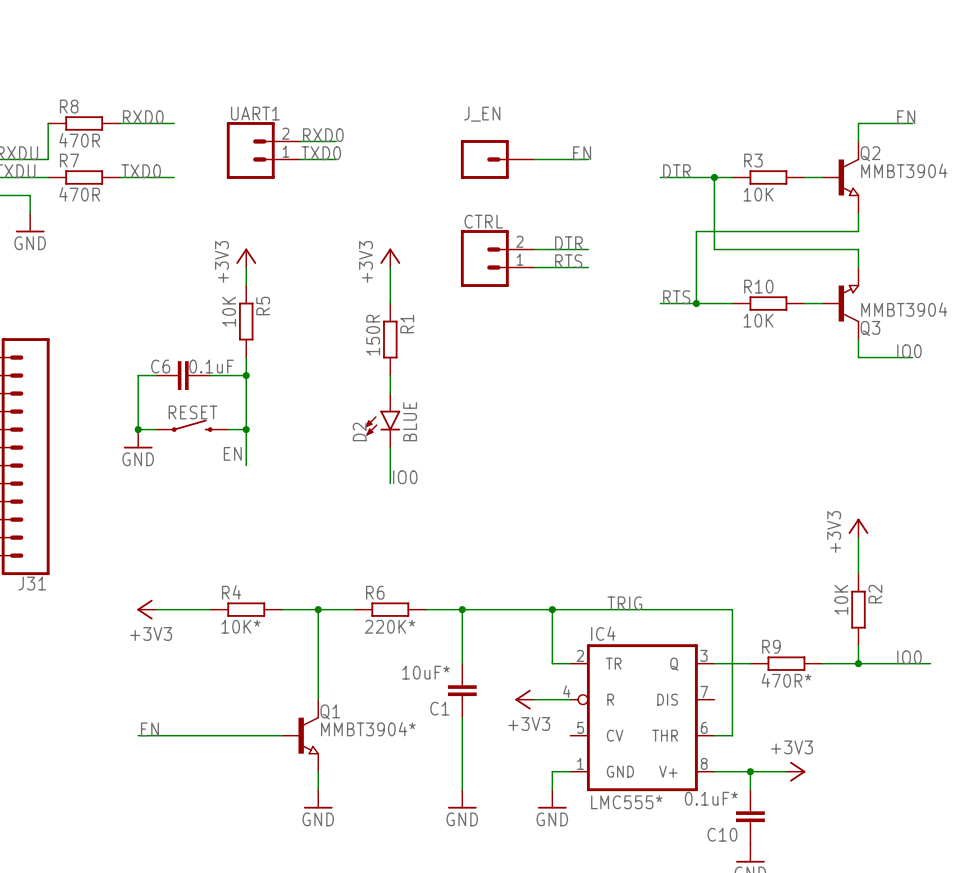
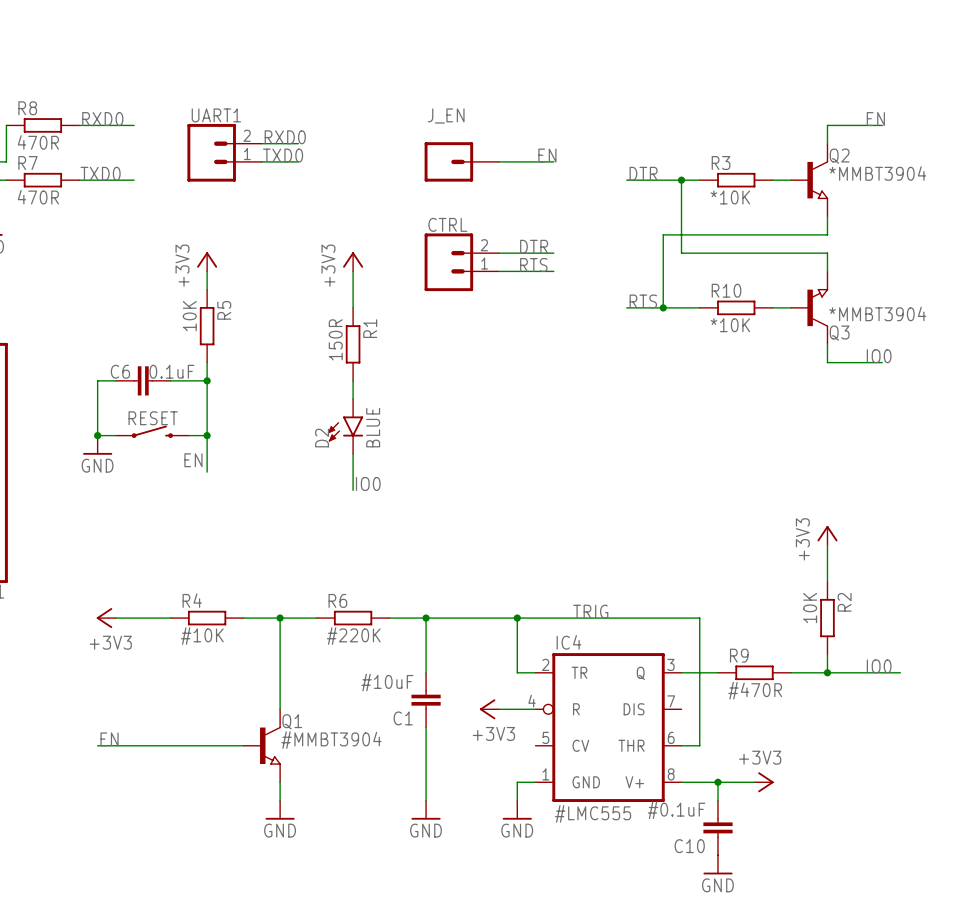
Q2 value: MMBT3904 (904, 170) -> *MMBT3904 (877, 173)
R3 value: 10K (758, 194) -> *10K (730, 197)
Q3 value: MMBT3904 (904, 309) -> *MMBT3904 (877, 313)
R10 value: 10K (758, 320) -> *10K (730, 325)
R4 value: 10K* (240, 626) -> #10K (202, 636)
R6 value: 220K* (390, 626) -> #220K (353, 636)
C1 value: 10uF* (426, 672) -> #10uF (387, 682)
R9 value: 470R* (786, 680) -> #470R (755, 690)
Q1 value: MMBT3904* (368, 729) -> #MMBT3904 (331, 740)
C10 value: 0.1uF* (711, 798) -> #0.1uF (676, 810)
IC4 value: LMC555* (626, 802) -> #LMC555 (593, 813)

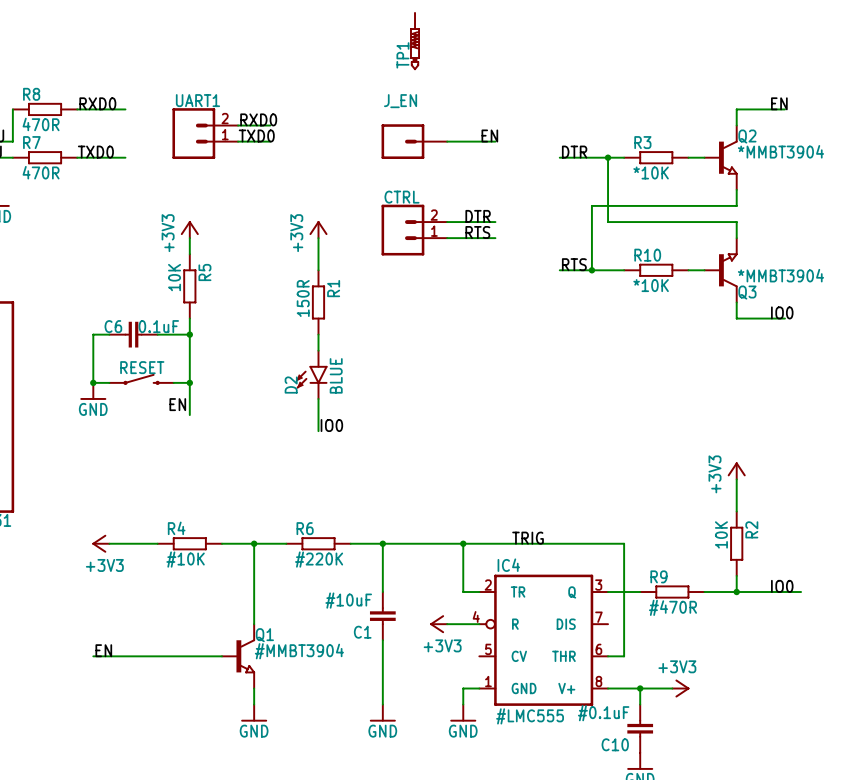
TP1: none -> (415, 41)

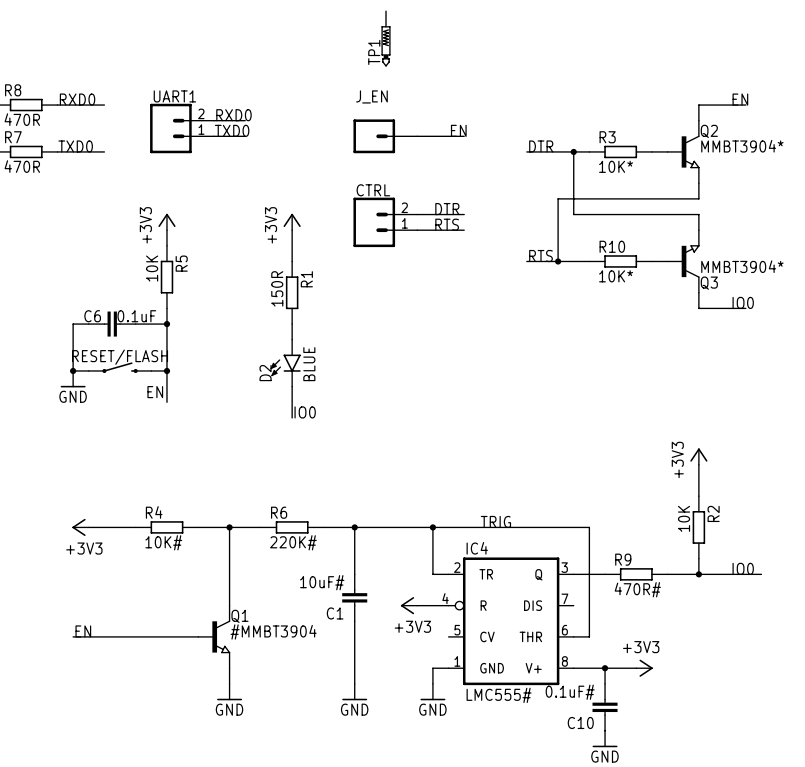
Q2 value: *MMBT3904 (780, 151) -> MMBT3904* (742, 146)
R3 value: *10K (651, 172) -> 10K* (616, 166)
Q3 value: *MMBT3904 (780, 275) -> MMBT3904* (742, 266)
R10 value: *10K (651, 285) -> 10K* (616, 276)
RESET name: RESET (142, 367) -> RESET/FLASH (120, 357)
R4 value: #10K (185, 559) -> 10K# (163, 542)
R6 value: #220K (319, 559) -> 220K# (293, 542)
C1 value: #10uF (348, 600) -> 10uF# (322, 582)
R9 value: #470R (672, 607) -> 470R# (637, 589)
C10 value: #0.1uF (603, 713) -> 0.1uF# (570, 692)
IC4 value: #LMC555 (530, 716) -> LMC555# (499, 695)

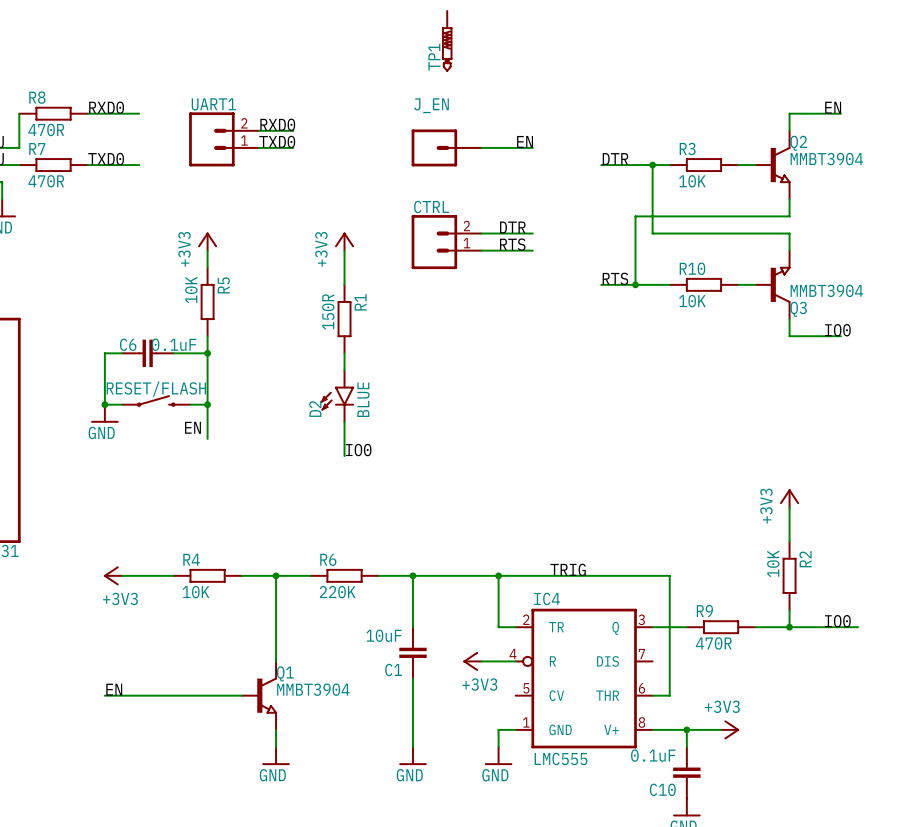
Q2 value: MMBT3904* (742, 146) -> MMBT3904 (826, 159)
R3 value: 10K* (616, 166) -> 10K (692, 181)
Q3 value: MMBT3904* (742, 266) -> MMBT3904 (826, 290)
R10 value: 10K* (616, 276) -> 10K (692, 301)
R4 value: 10K# (163, 542) -> 10K (196, 592)
R6 value: 220K# (293, 542) -> 220K (337, 592)
C1 value: 10uF# (322, 582) -> 10uF (384, 635)
R9 value: 470R# (637, 589) -> 470R (713, 643)
Q1 value: #MMBT3904 (273, 631) -> MMBT3904 (313, 689)
C10 value: 0.1uF# (570, 692) -> 0.1uF (653, 755)
IC4 value: LMC555# (499, 695) -> LMC555 (561, 759)

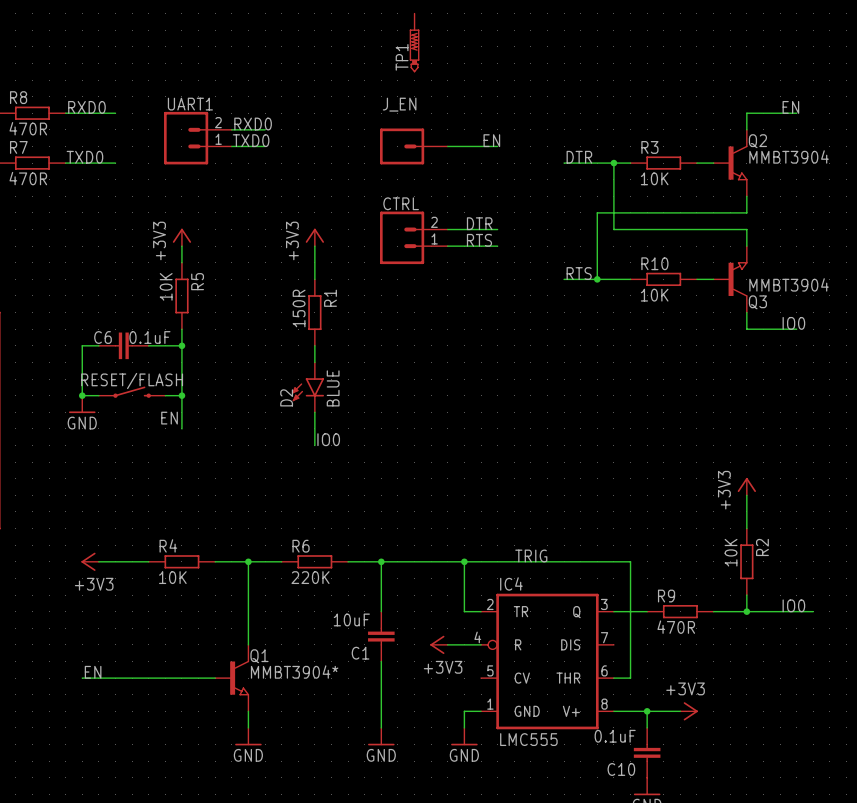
Q1 value: MMBT3904 (313, 689) -> MMBT3904* (294, 672)

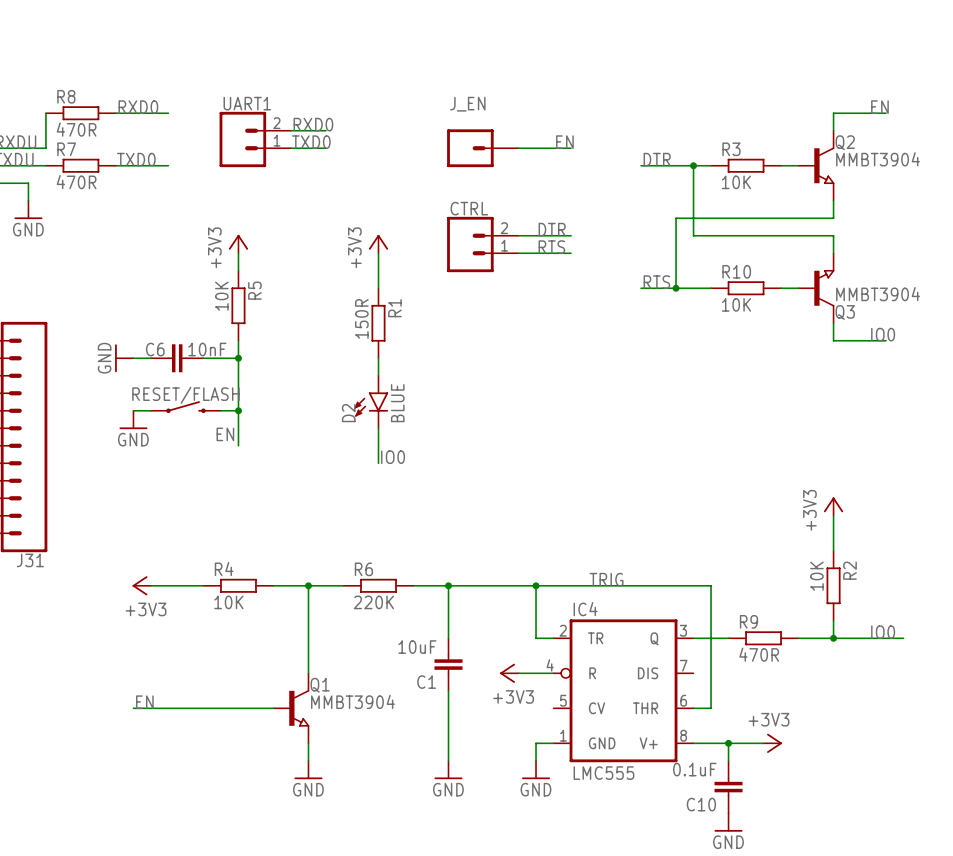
TP1: (414, 42) -> none
C6 value: 0.1uF (149, 337) -> 10nF (207, 349)
power symbol: none -> GND (124, 358)
wire: (82, 345) (82, 395) -> none
junction: (82, 395) -> none
Q1 value: MMBT3904* (294, 672) -> MMBT3904 (352, 701)

